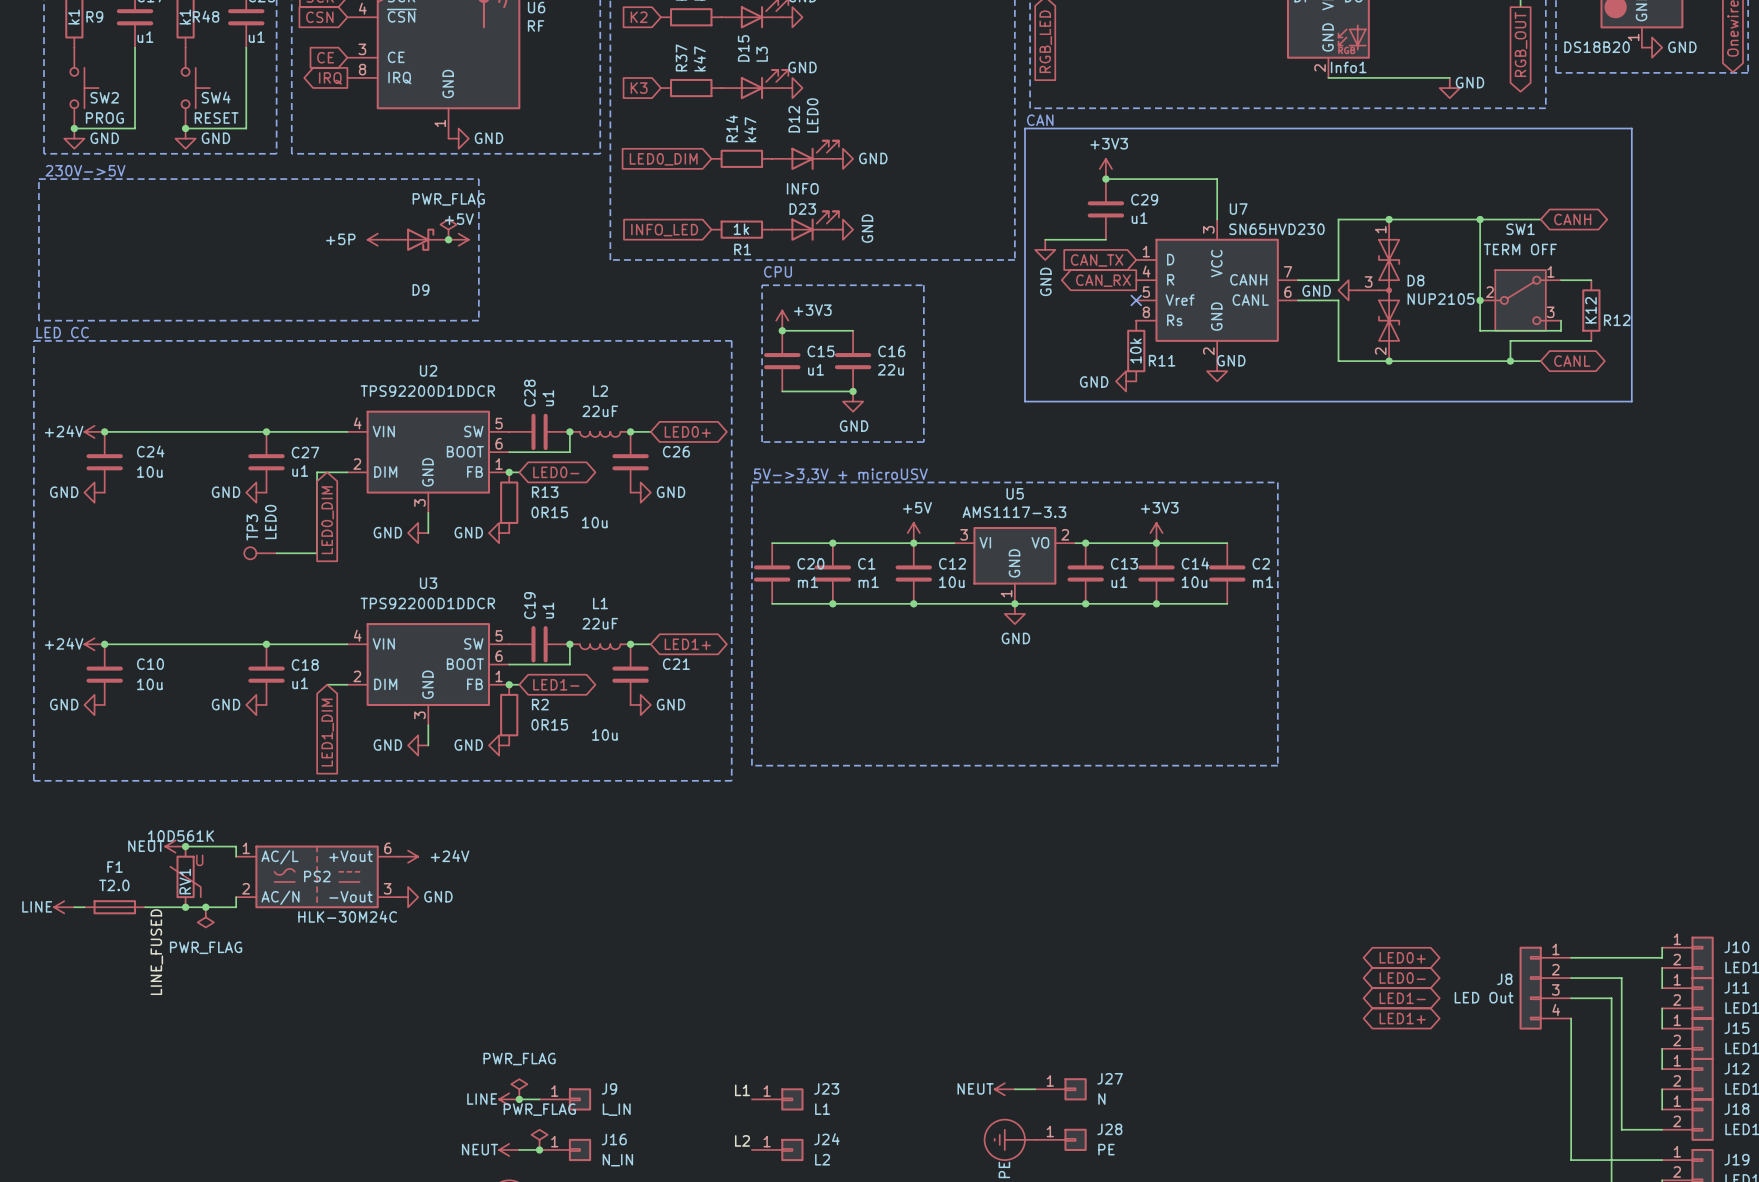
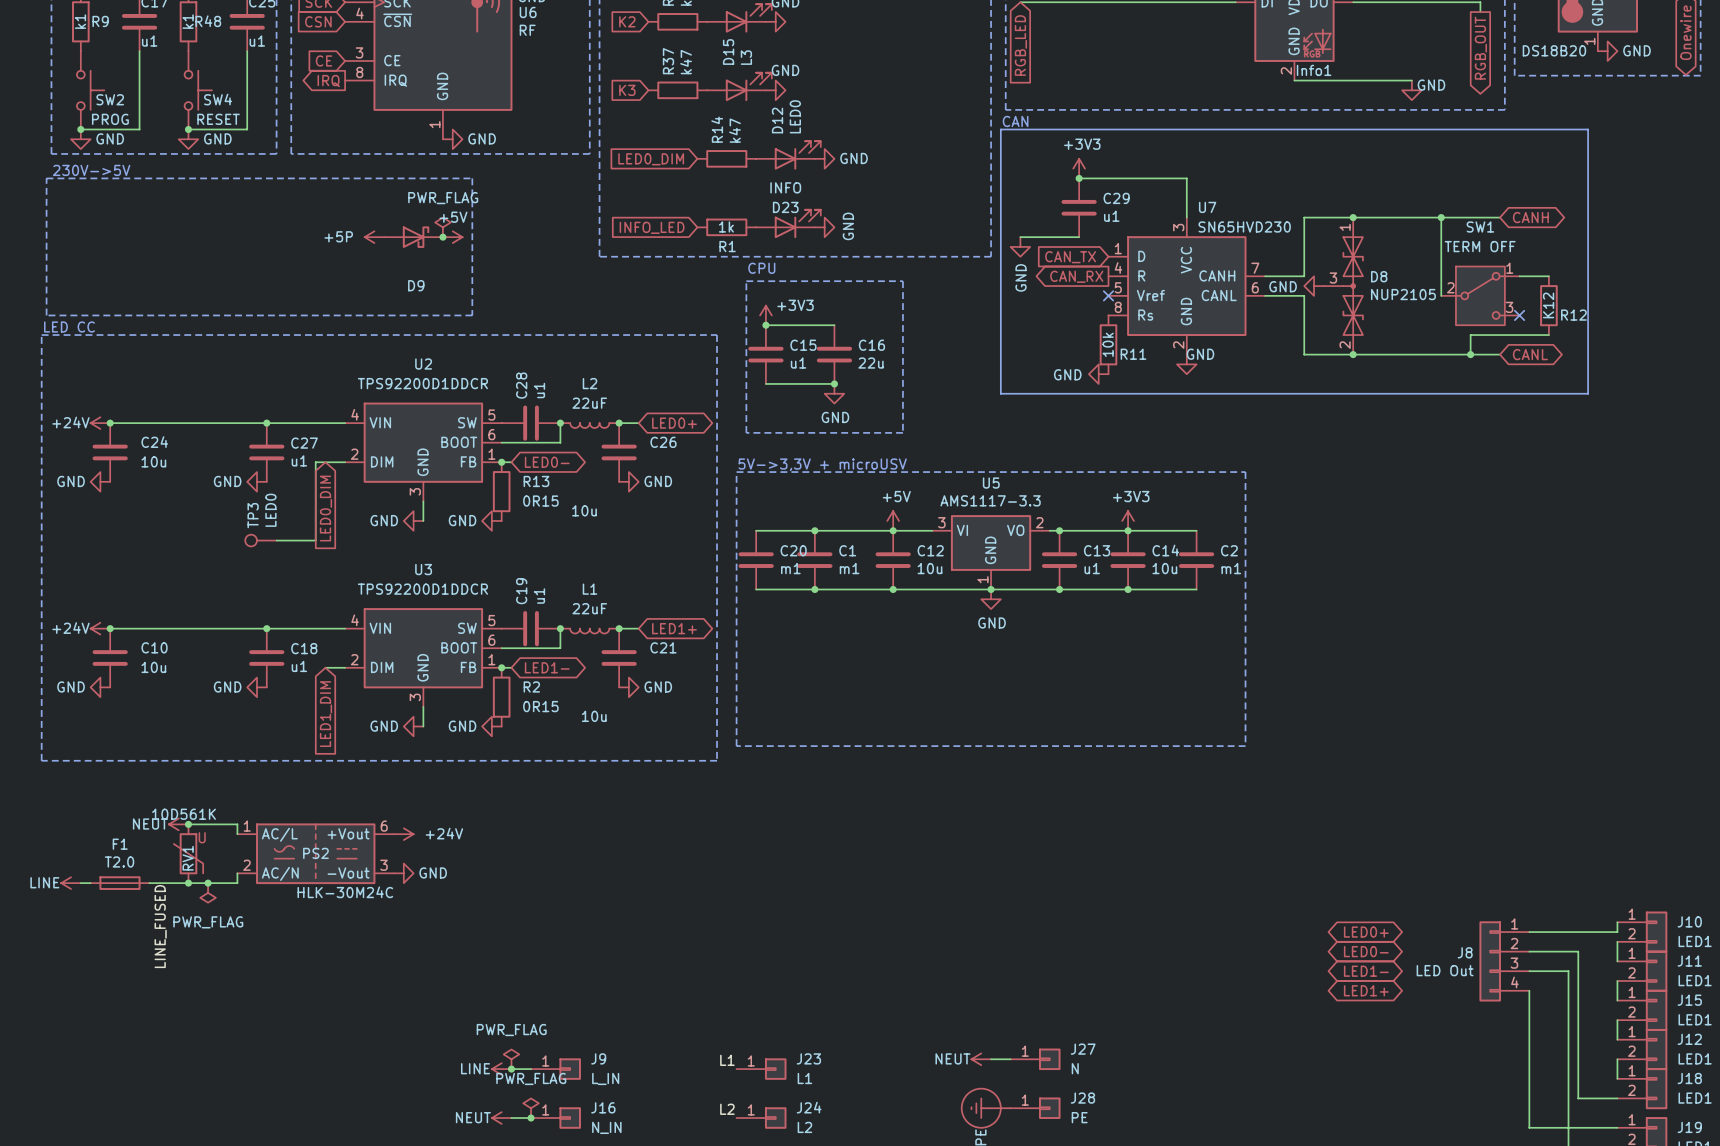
wire: (1480, 300) (1480, 330) (1561, 330) (1561, 320) -> none
junction: (1480, 300) -> none
no-connect mark: none -> (1519, 315)

